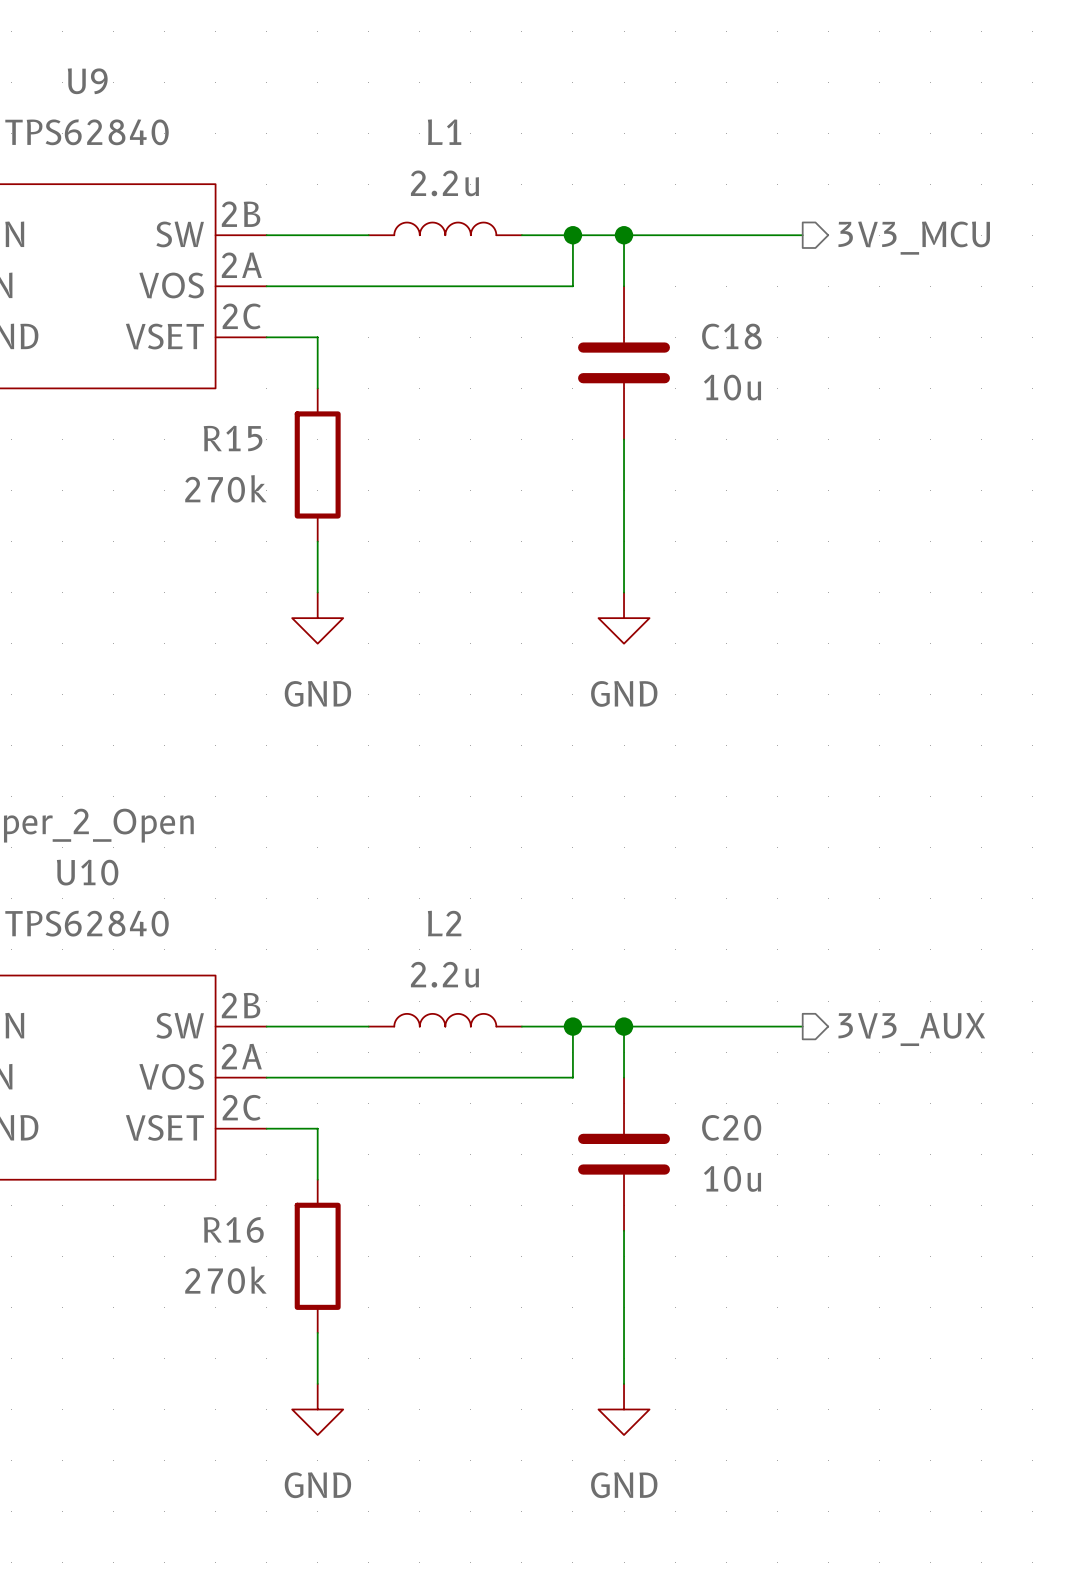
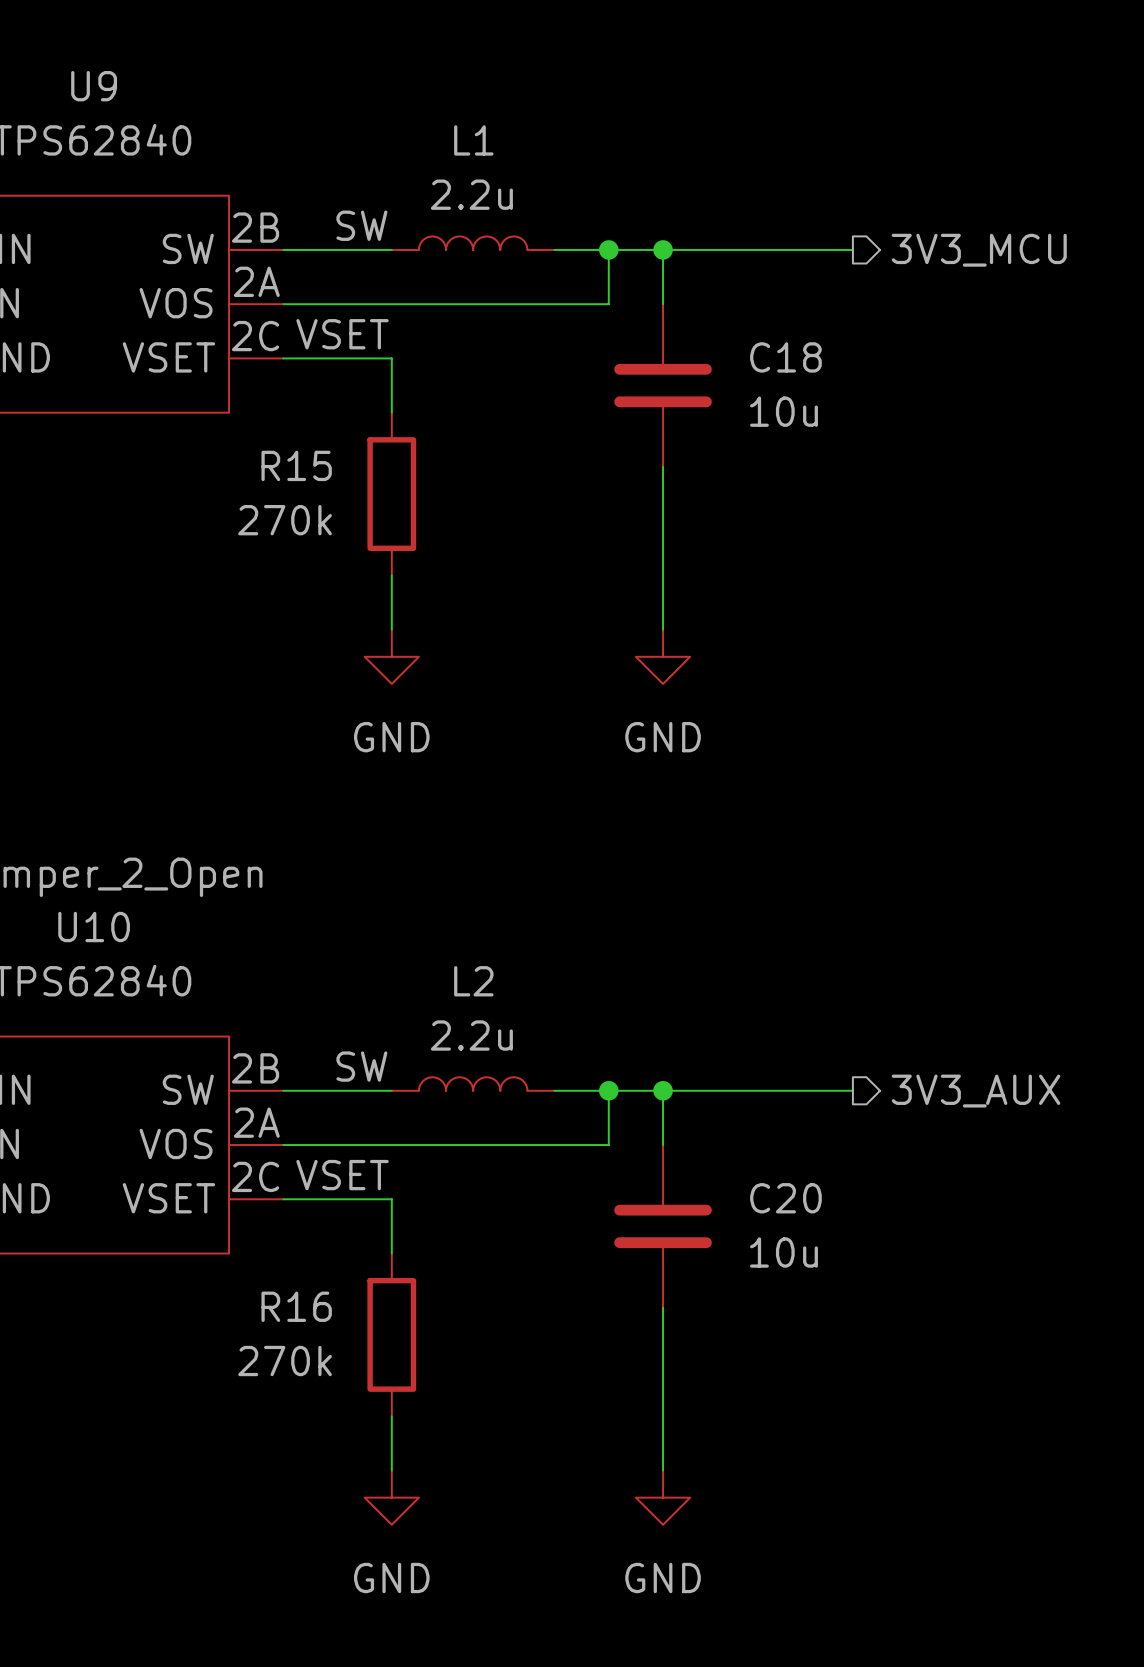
label: none -> SW (361, 225)
label: none -> VSET (342, 334)
wire: (317, 337) (317, 388) -> (337, 358) (391, 358) (391, 412)
R15 position: (317, 464) -> (391, 494)
wire: (317, 541) (317, 592) -> (391, 575) (391, 629)
power symbol position: GND (317, 618) -> GND (391, 656)
label: none -> SW (361, 1066)
label: none -> VSET (342, 1175)
wire: (317, 1128) (317, 1179) -> (337, 1199) (391, 1199) (391, 1253)
R16 position: (317, 1256) -> (391, 1334)
wire: (317, 1332) (317, 1383) -> (391, 1416) (391, 1470)
power symbol position: GND (317, 1409) -> GND (391, 1497)

